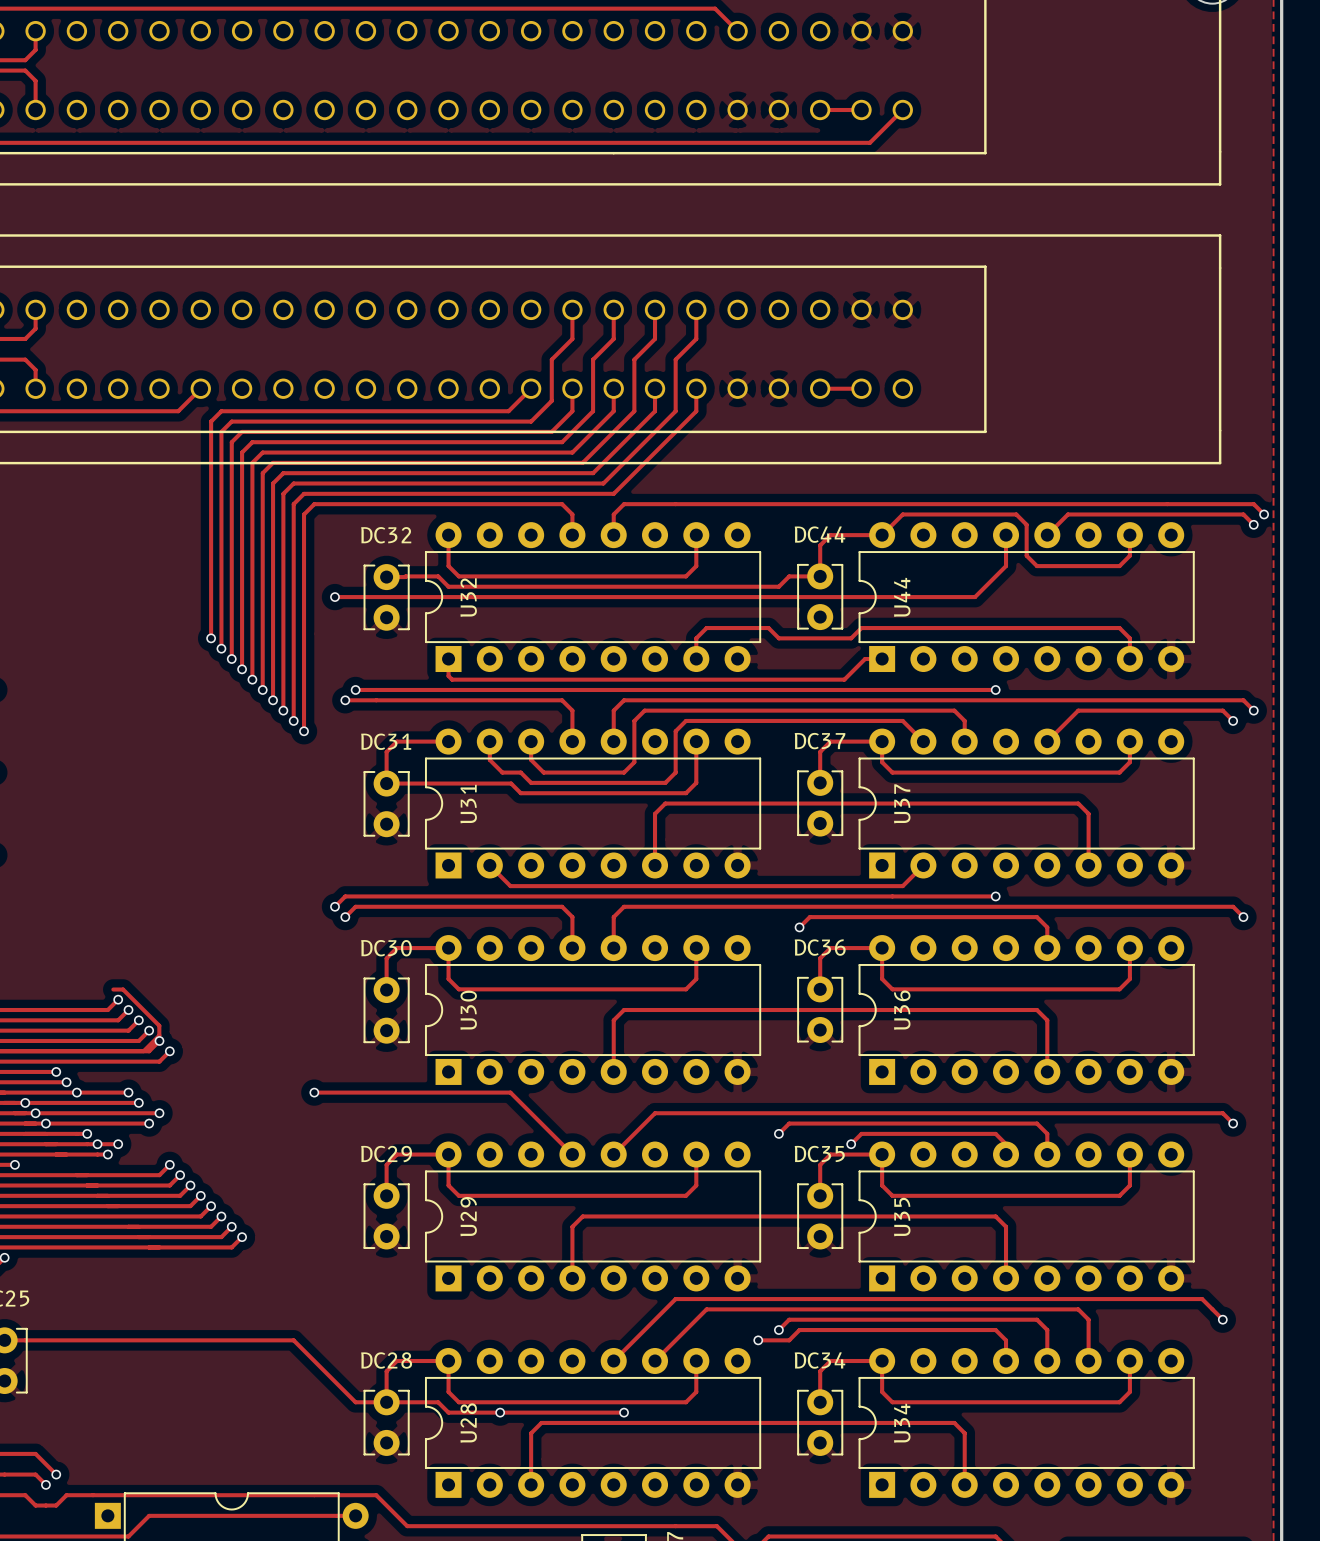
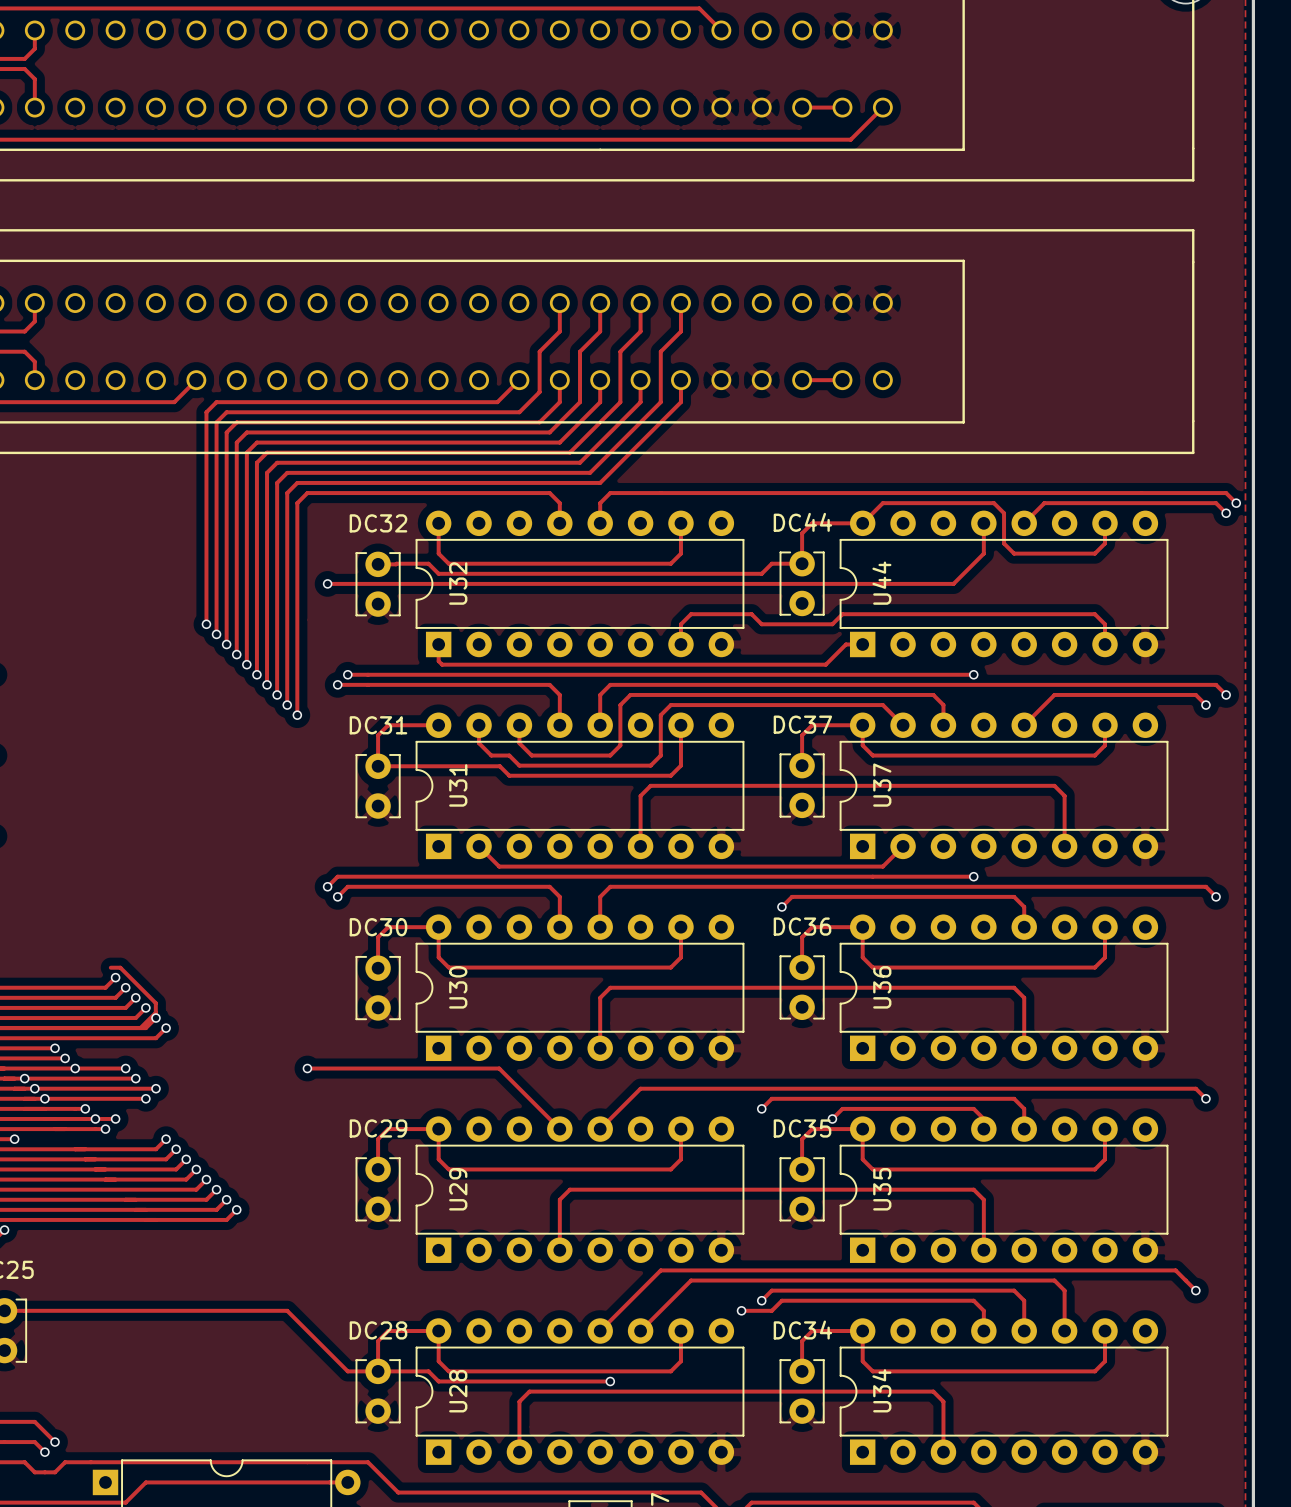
via: (500, 1412) -> none

